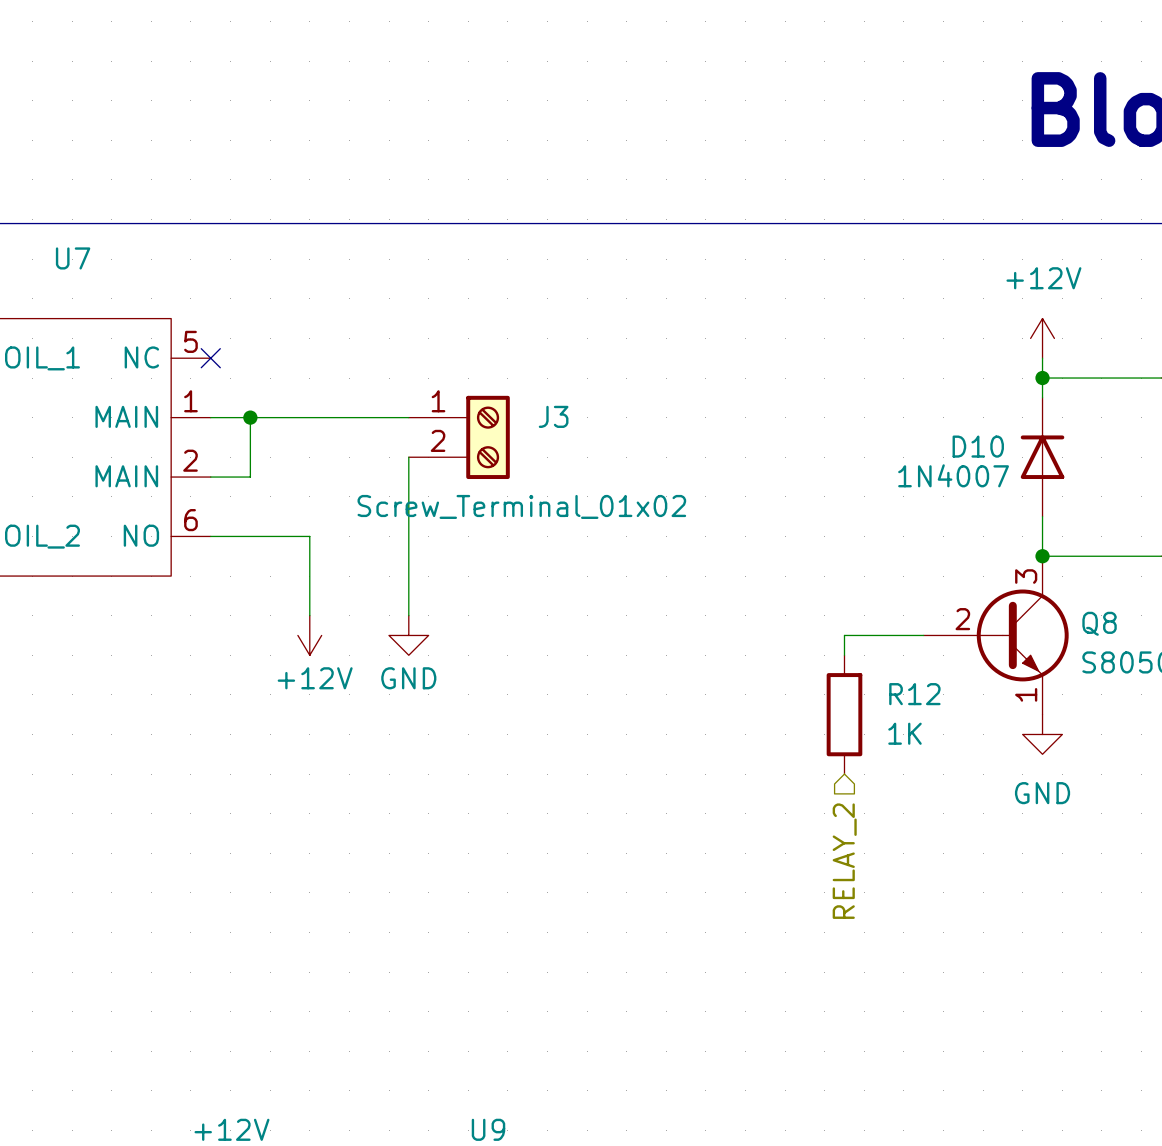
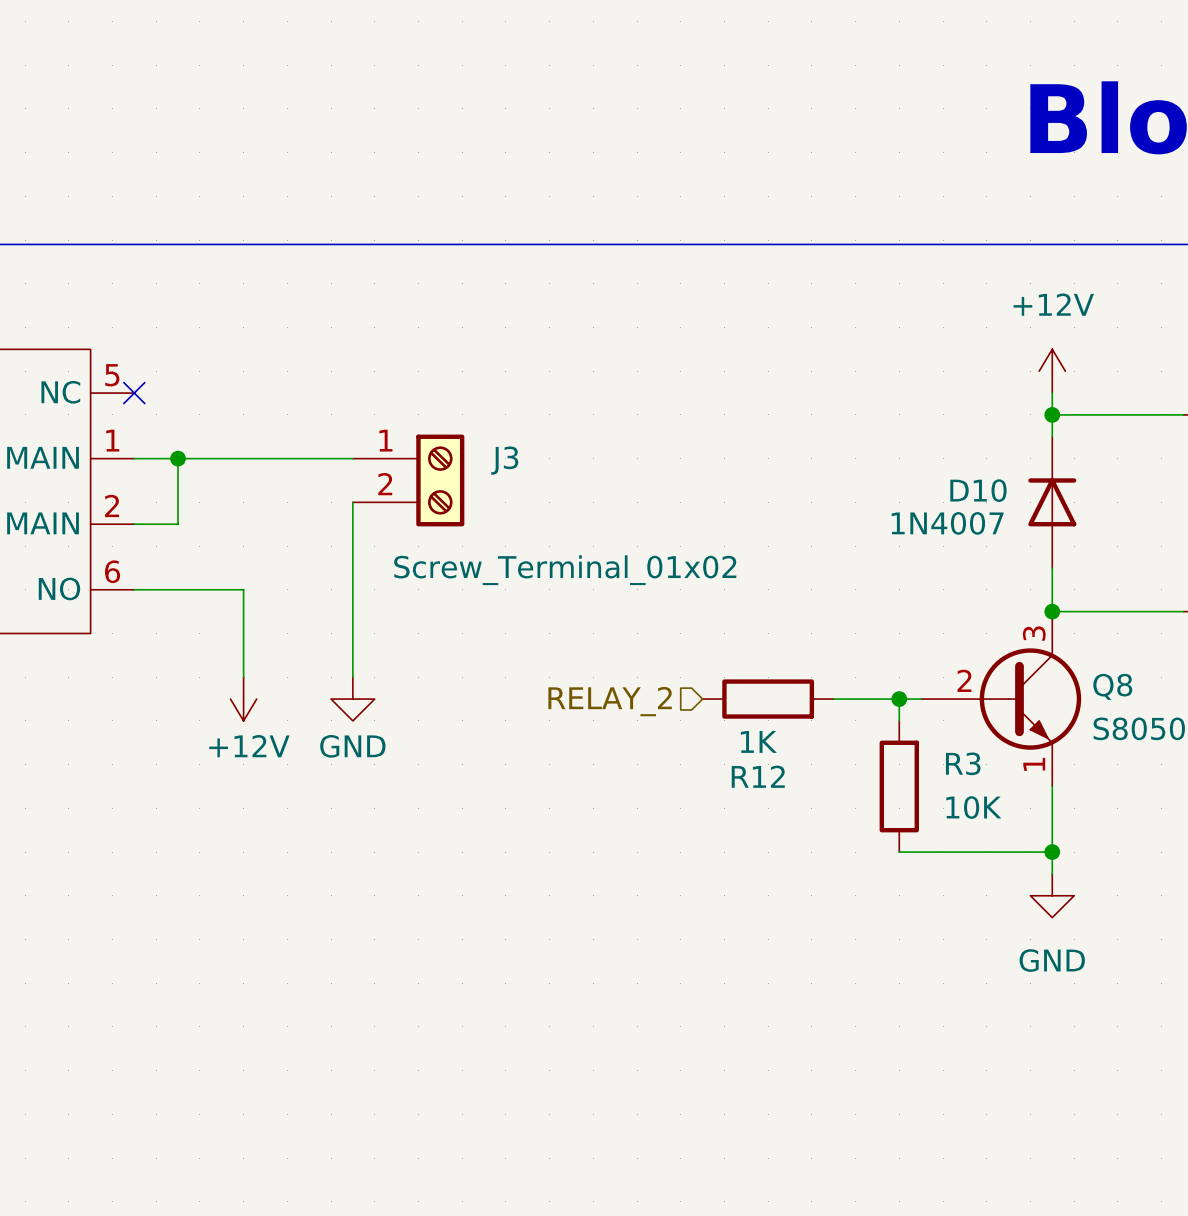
J3 value position: Screw_Terminal_01x02 (521, 506) -> Screw_Terminal_01x02 (565, 570)
wire: (844, 635) (844, 655) -> (899, 699) (899, 720)
junction: none -> (899, 699)
R12 rotation: 0° (844, 714) -> 90° clockwise (768, 699)
R12 position: (844, 714) -> (768, 699)
R3: none -> 10K (899, 786)
wire: none -> (1052, 786) (1052, 873)
power symbol position: GND (1042, 734) -> GND (1052, 895)
wire: none -> (899, 852) (1052, 852)
junction: none -> (1052, 852)
hierarchical label rotation: 0° (844, 861) -> 90° clockwise (610, 701)
hierarchical label position: RELAY_2 (844, 861) -> RELAY_2 (610, 701)

